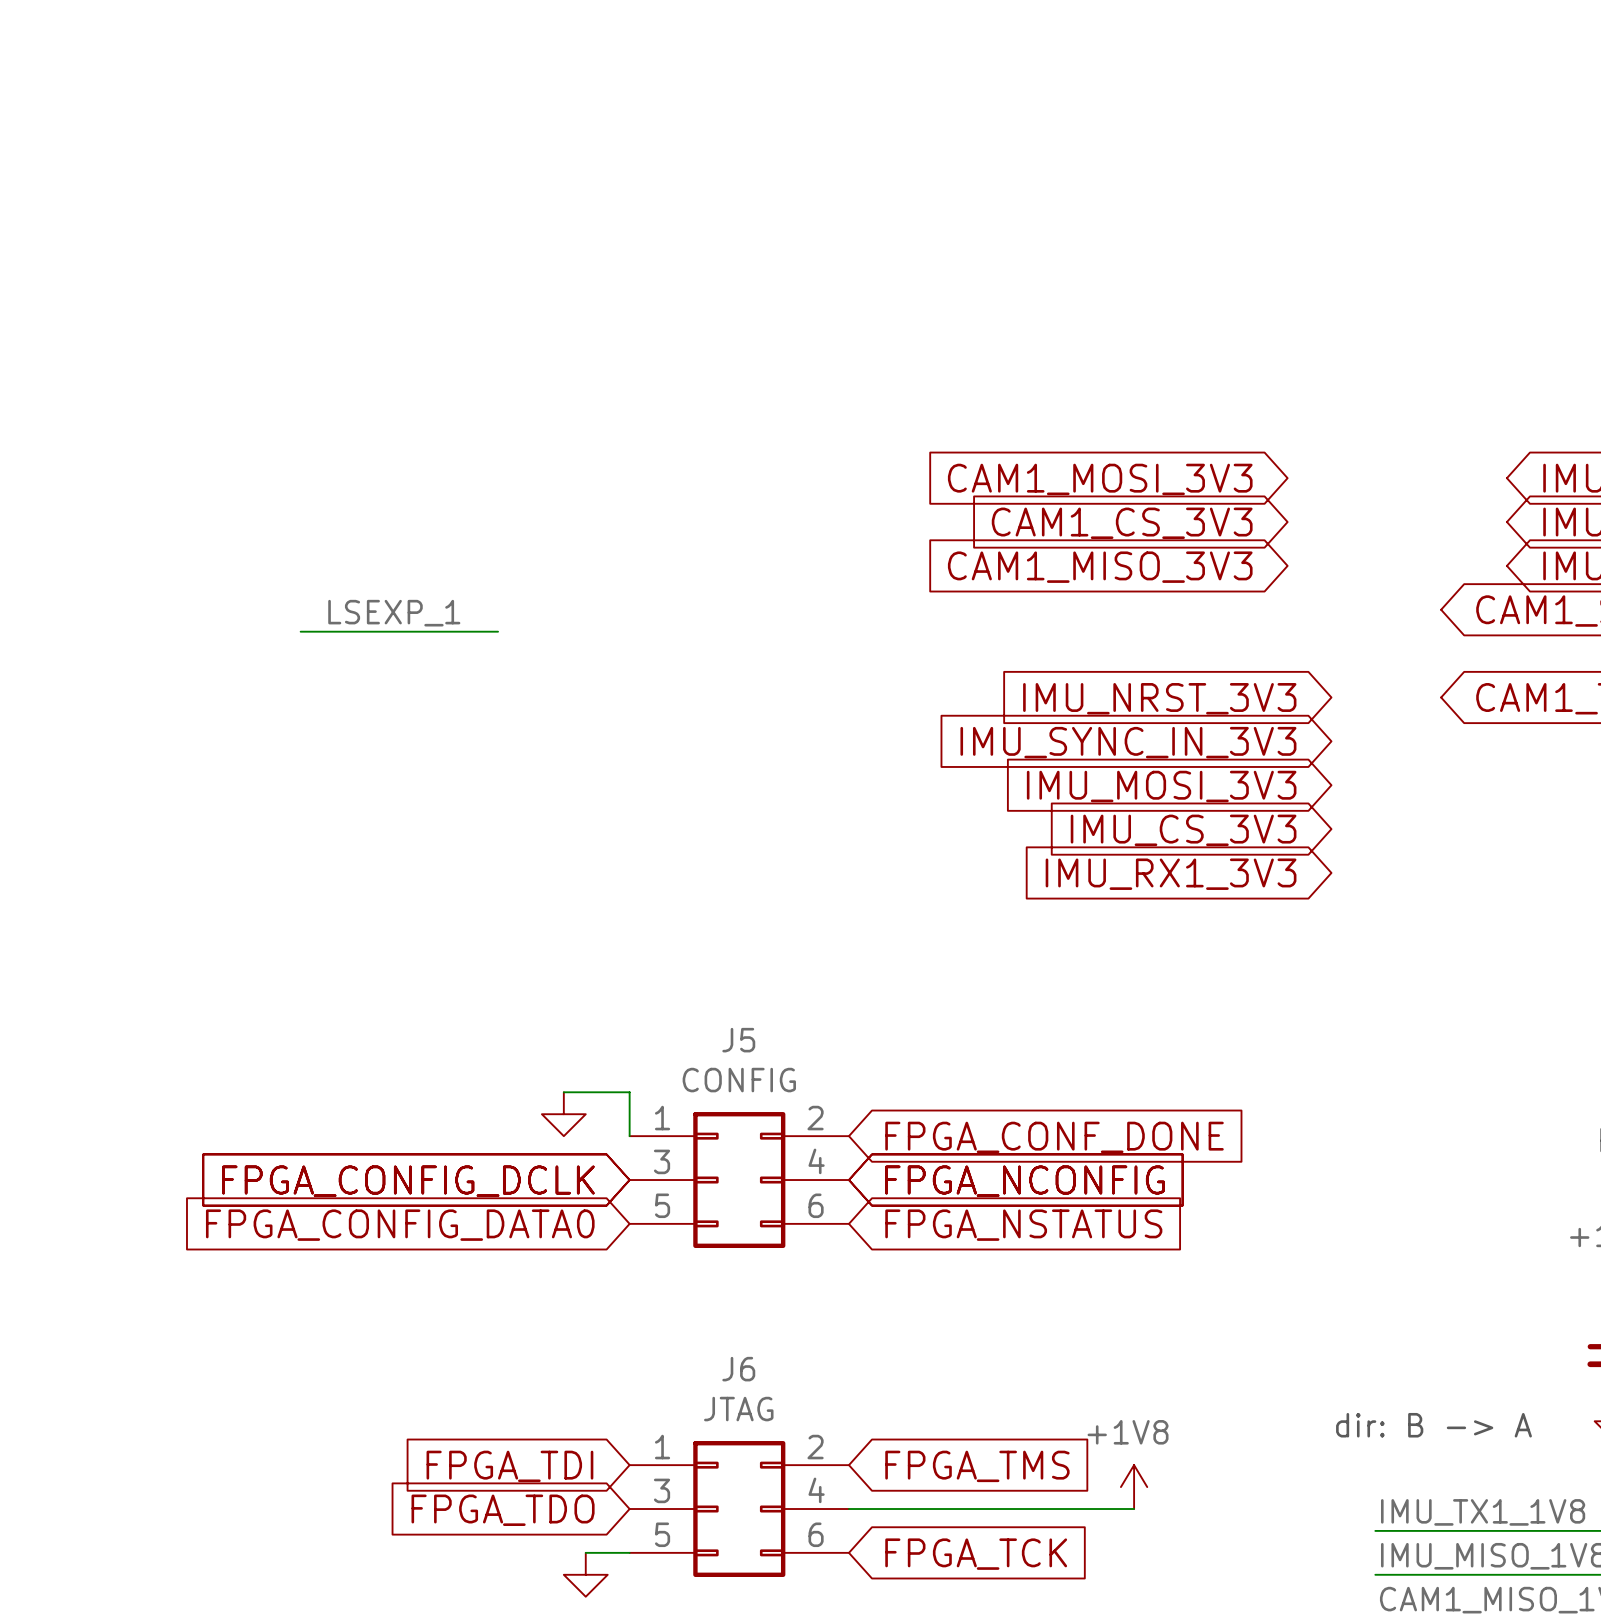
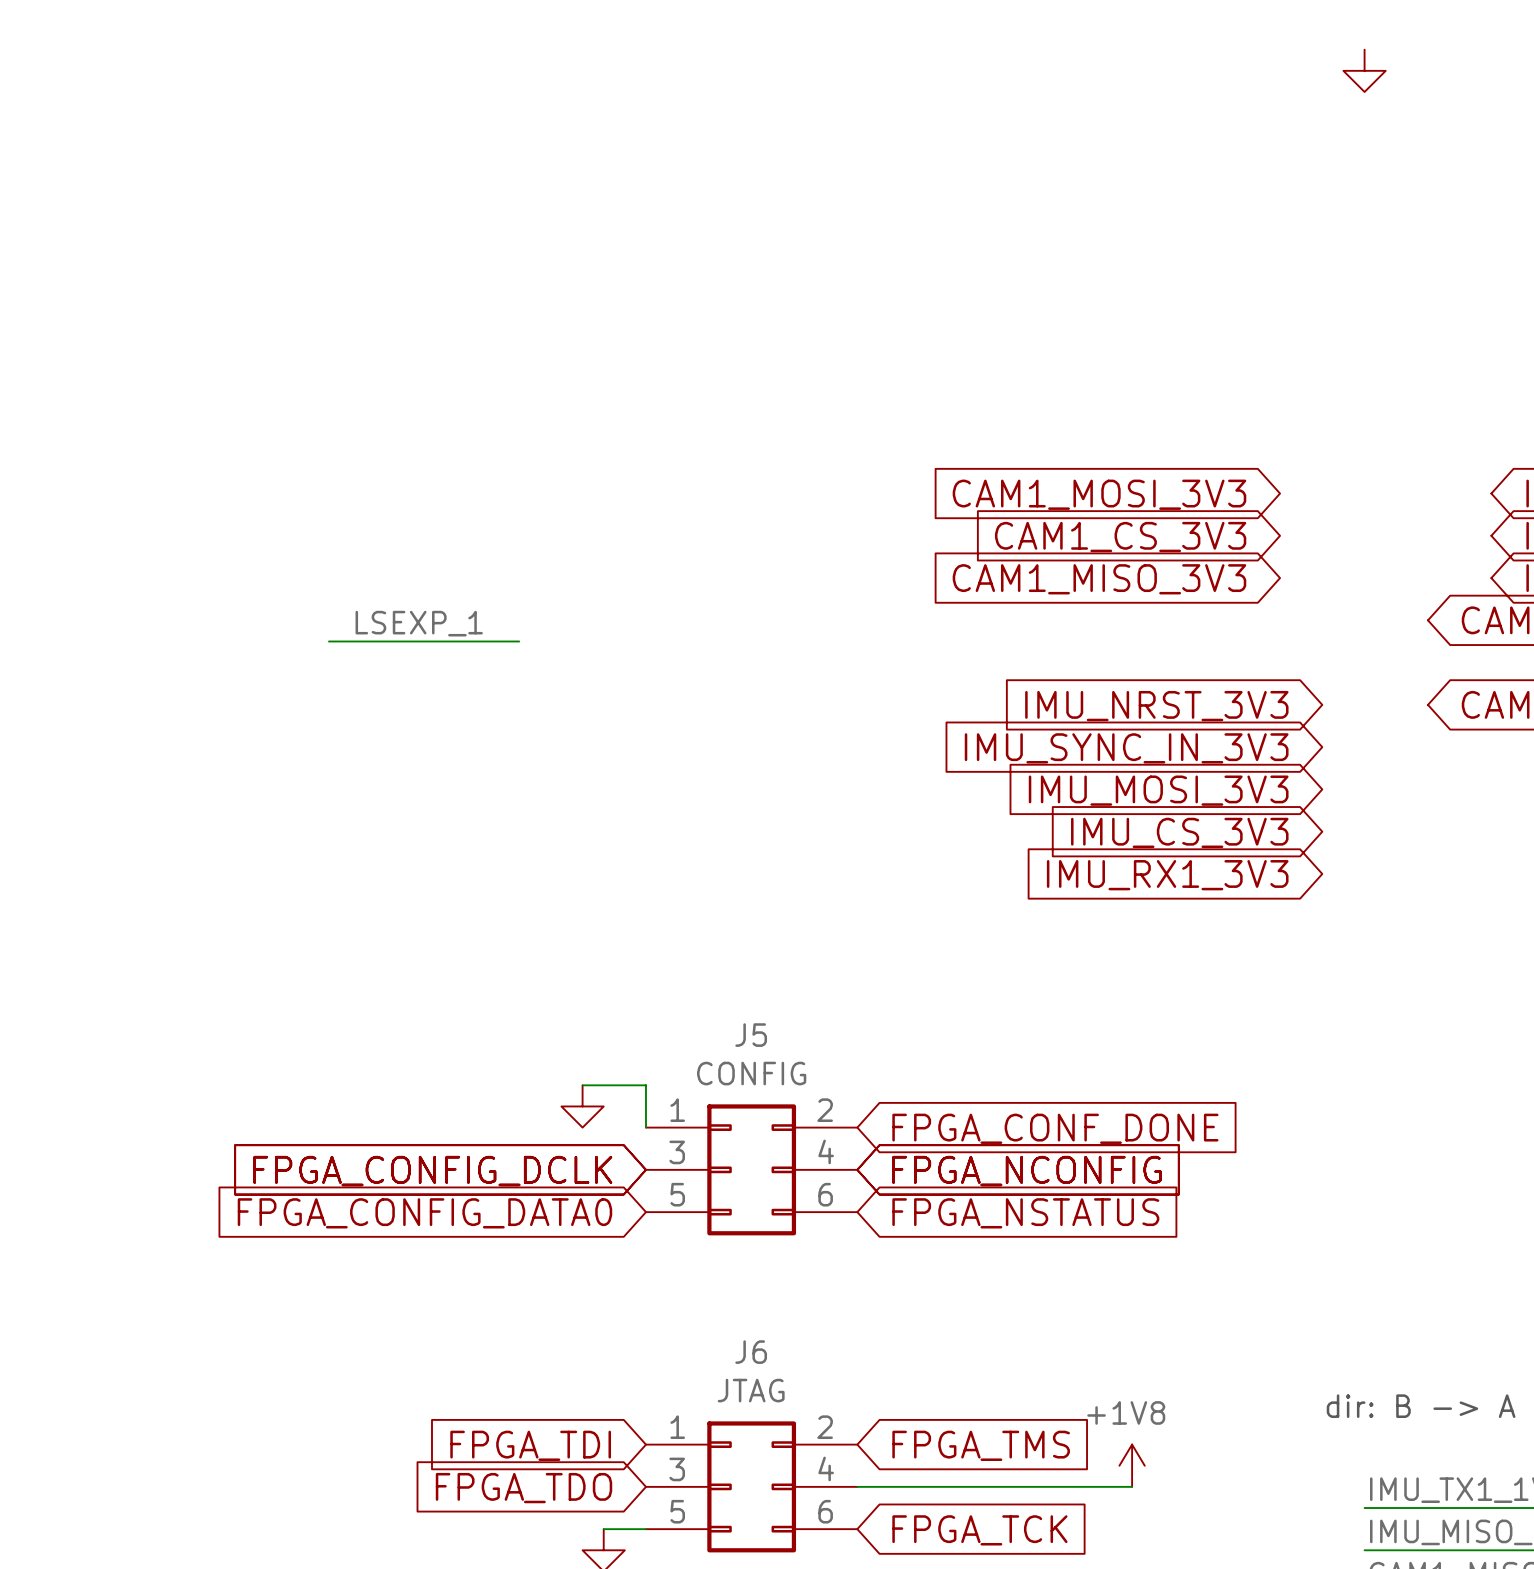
power symbol: none -> (1364, 70)

